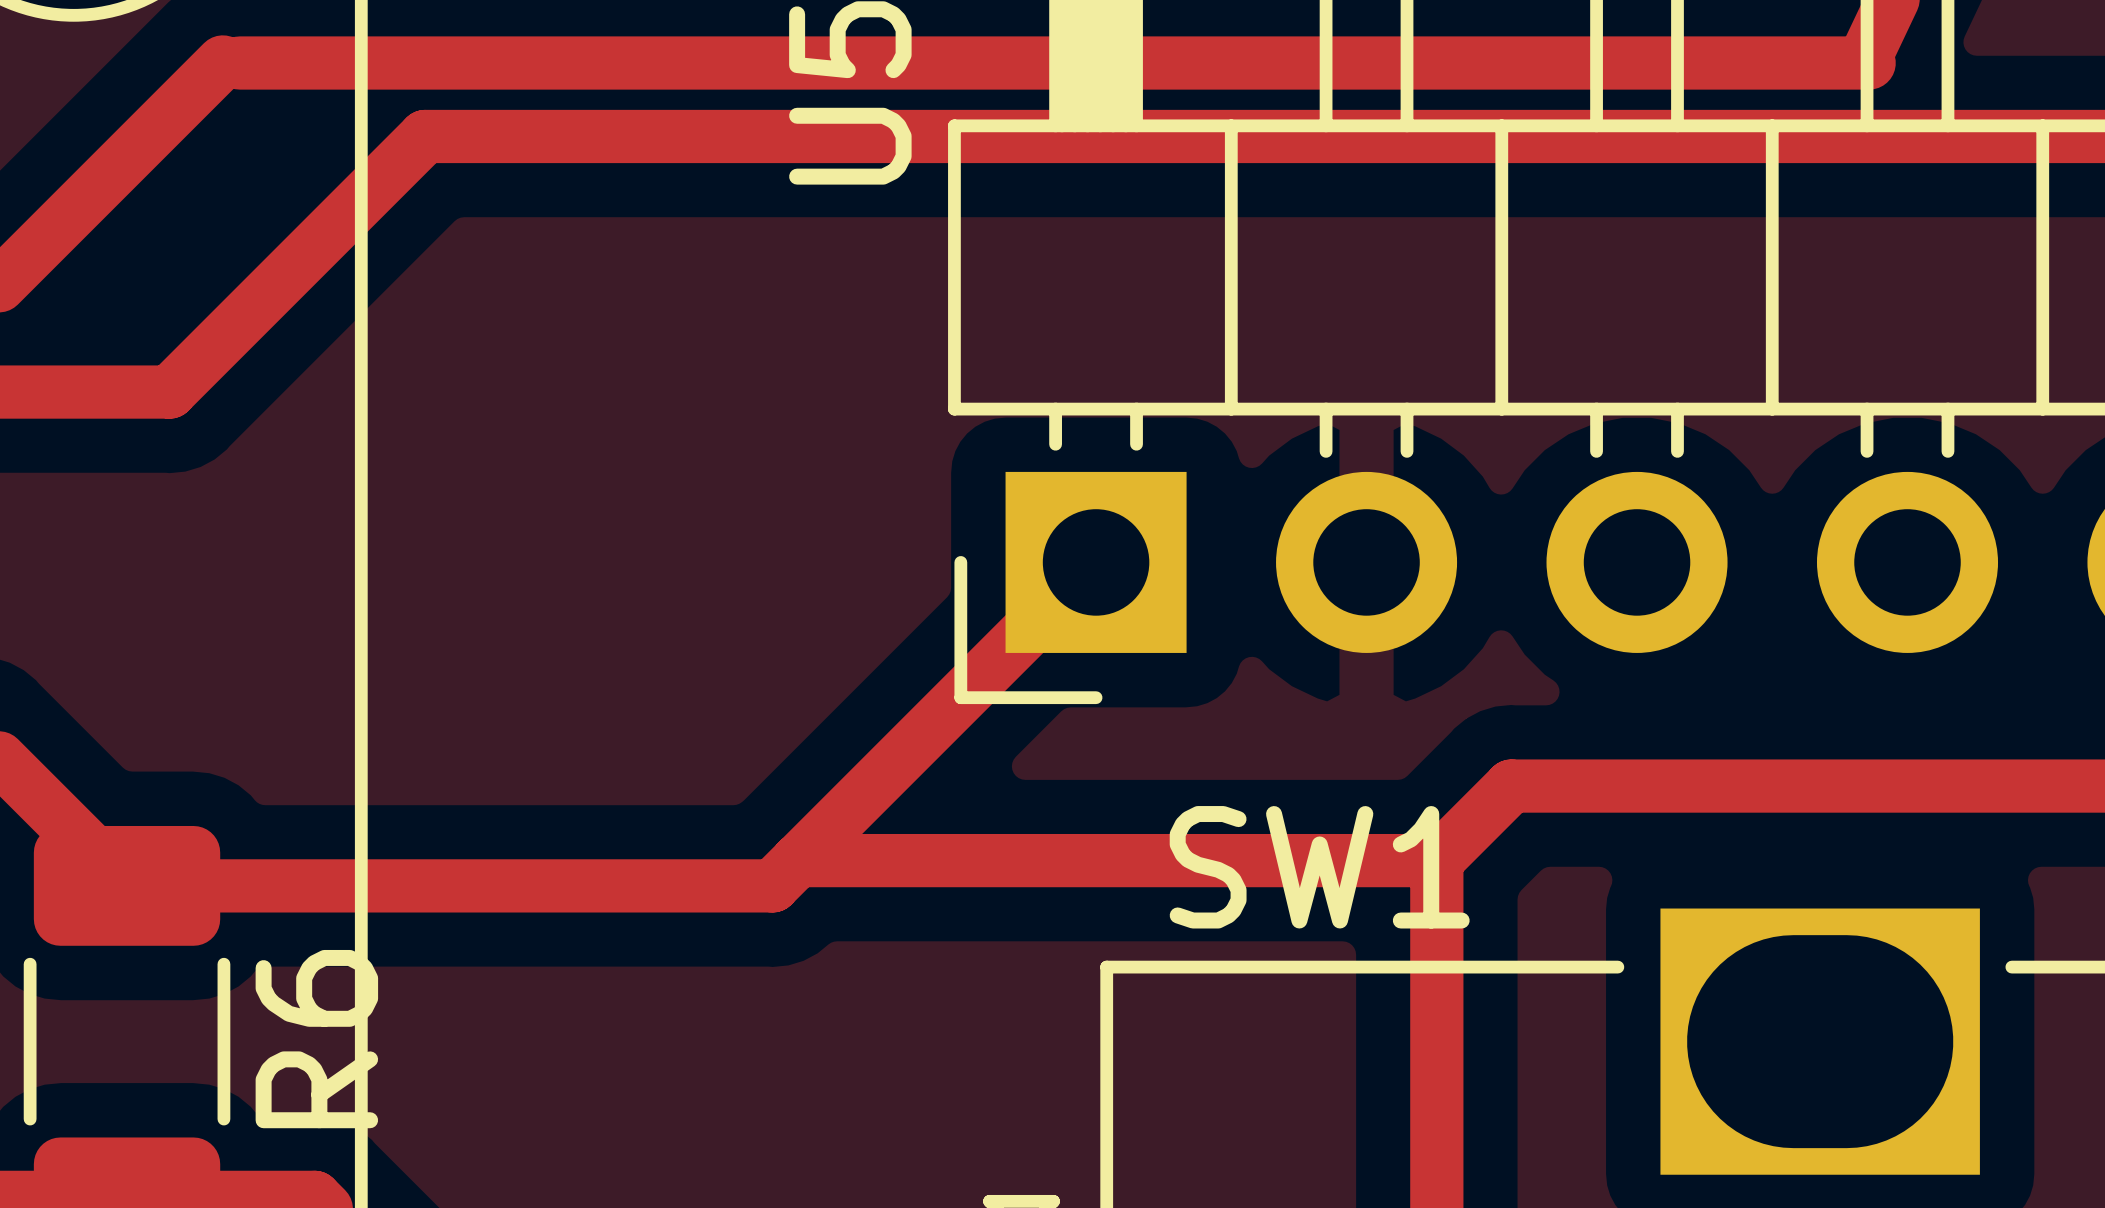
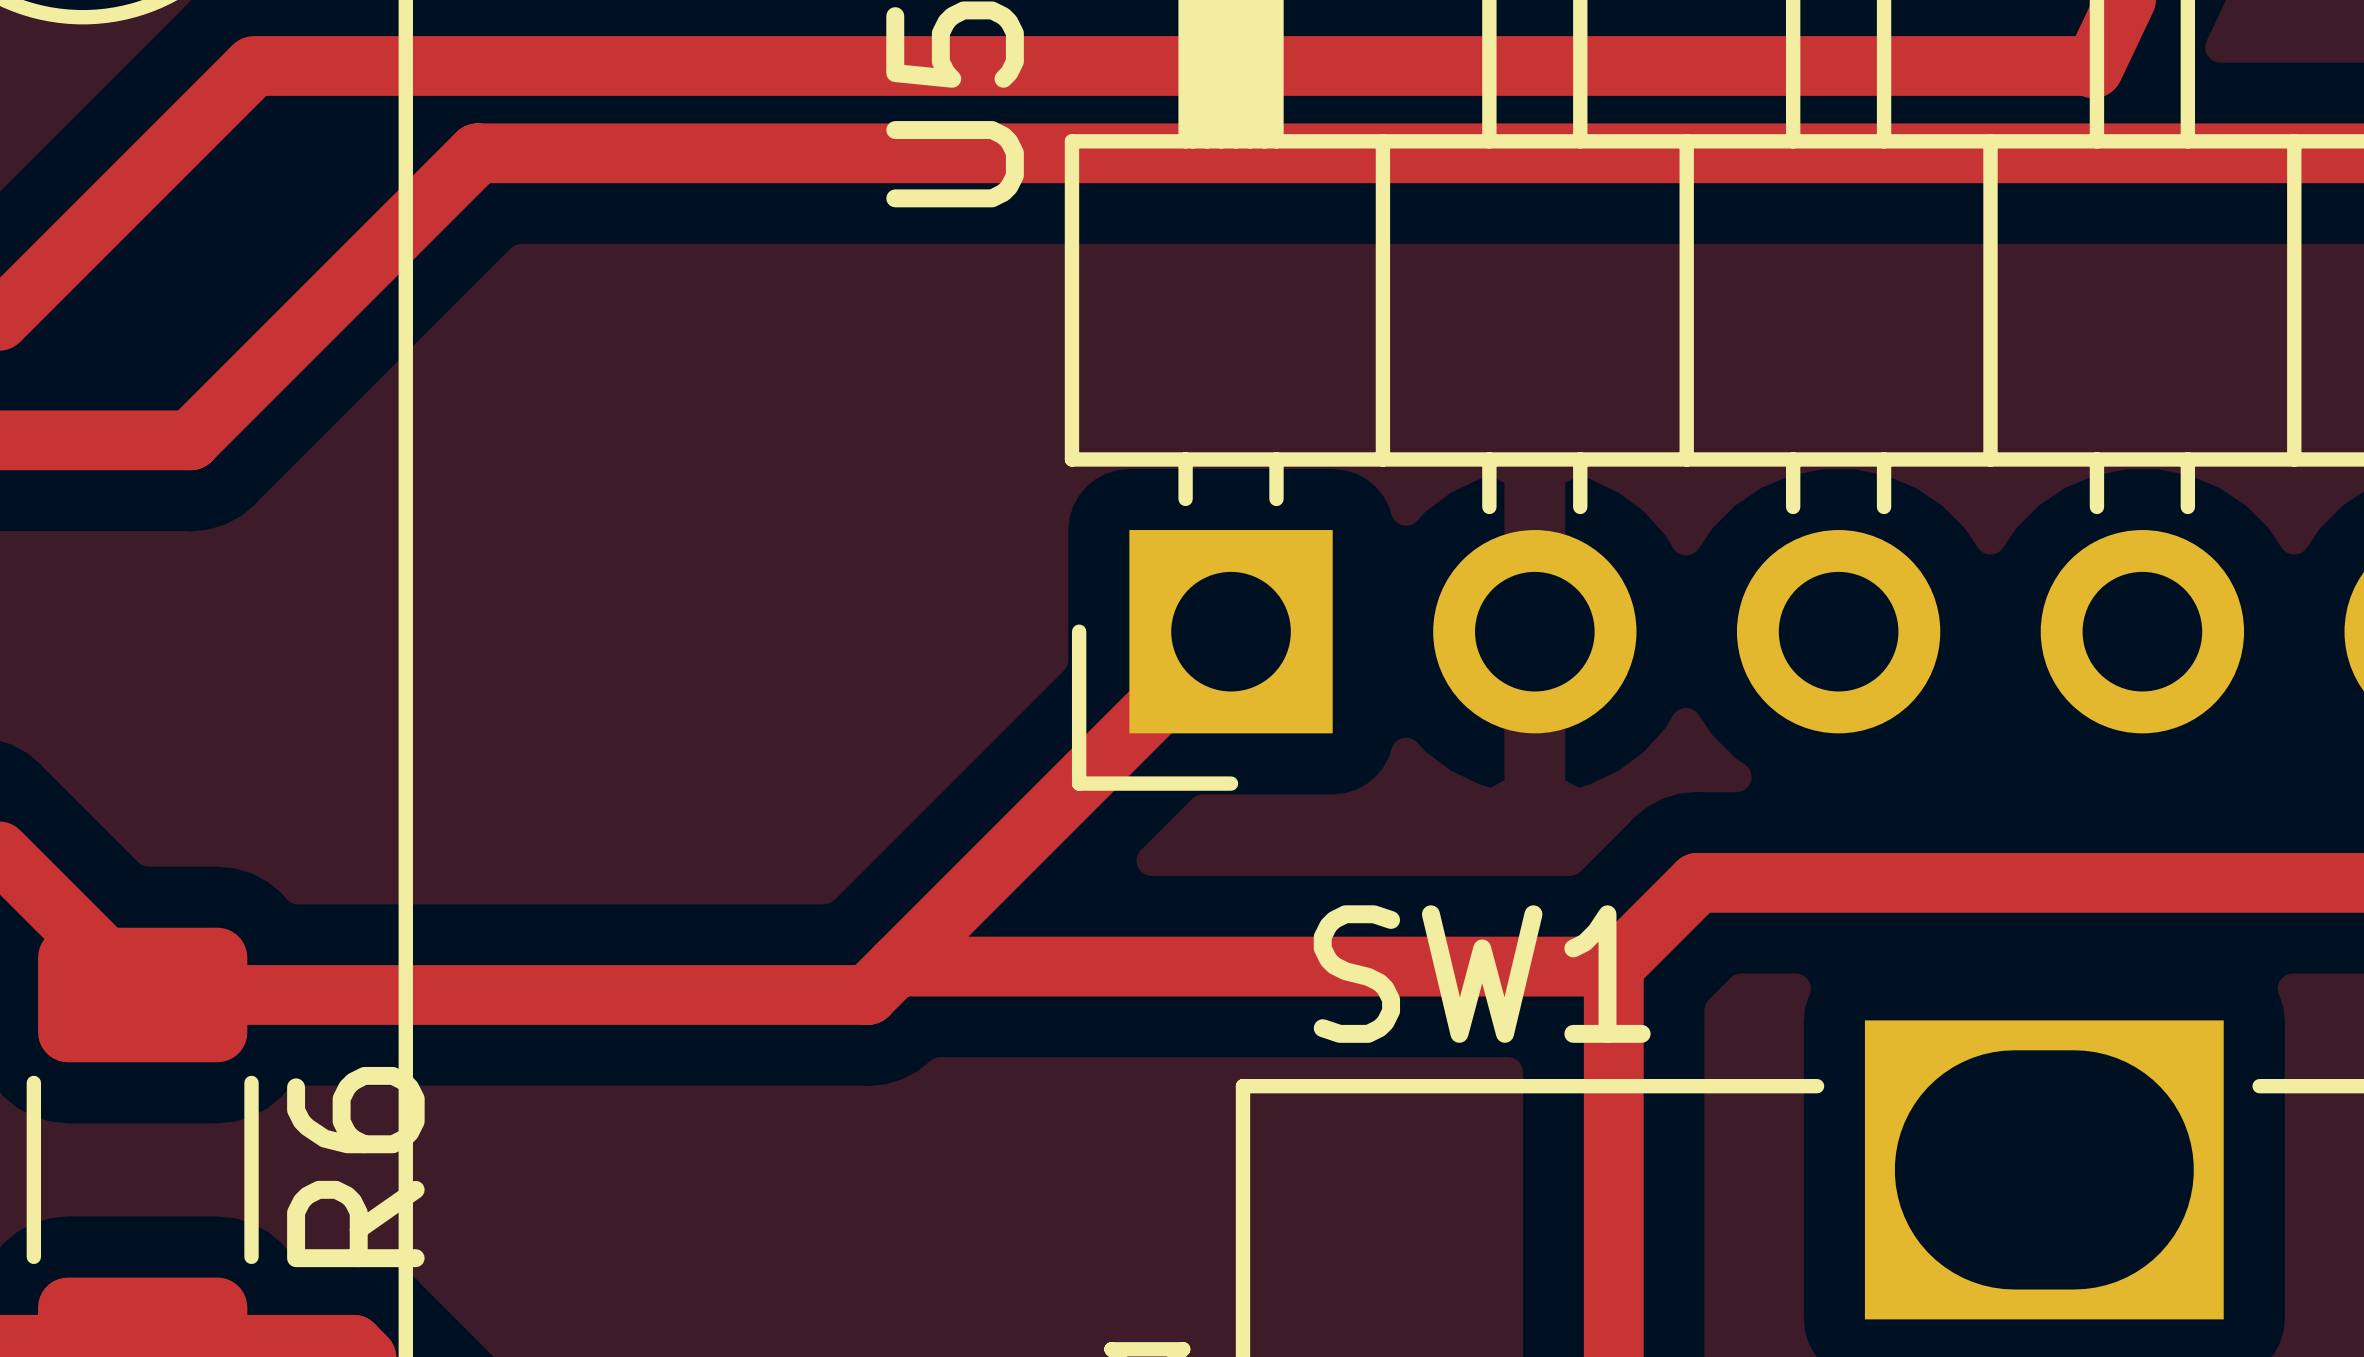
track: (239, 63) (1869, 63) -> (253, 65) (2083, 65)

